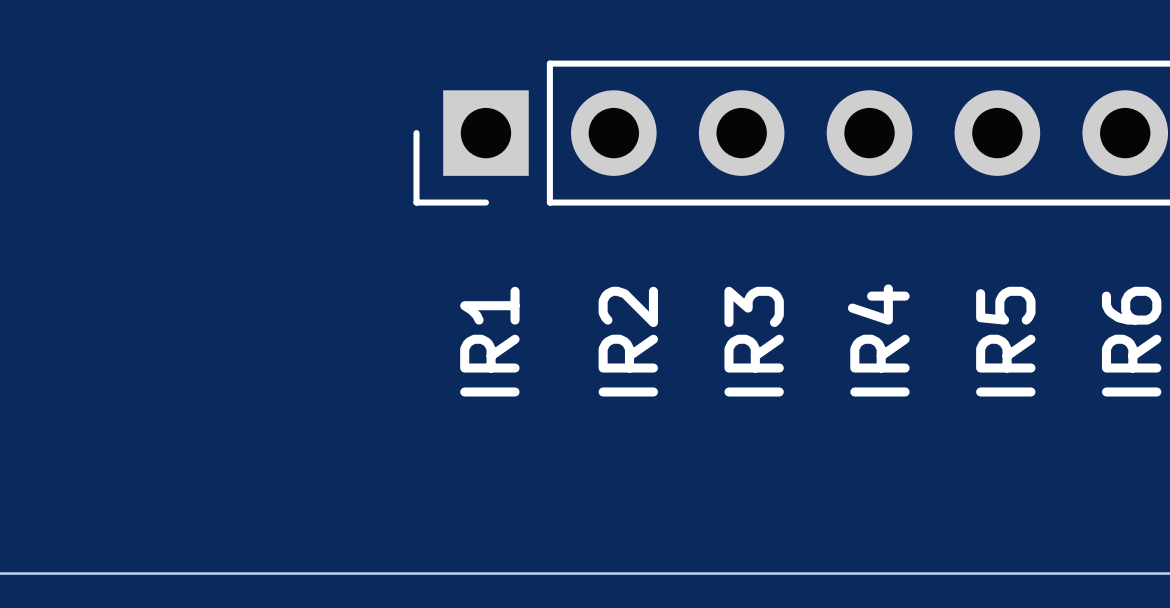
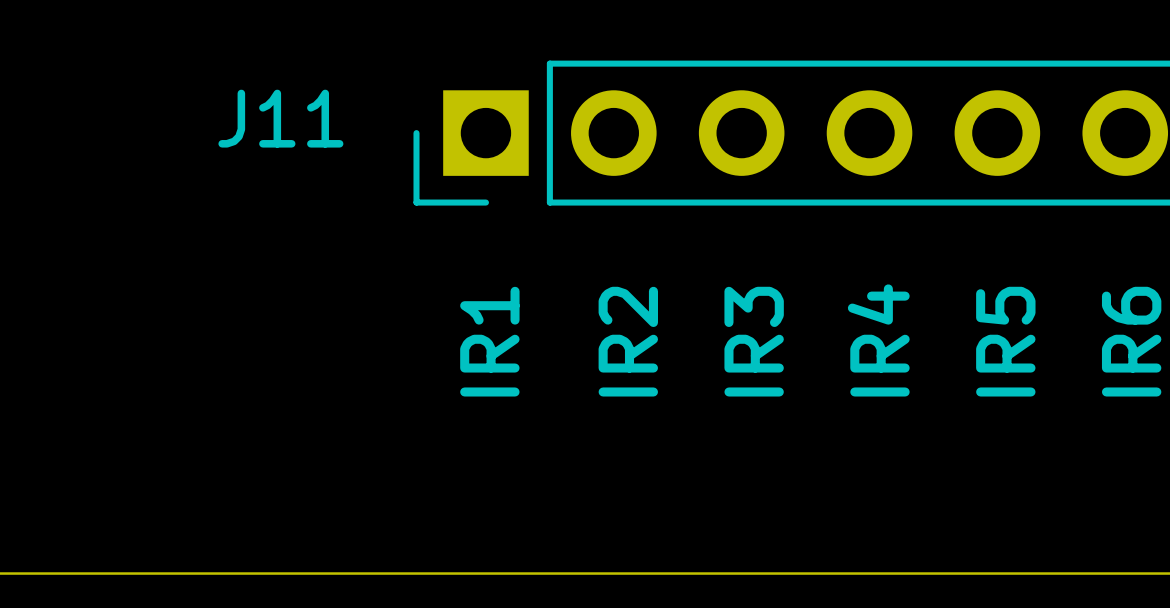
J11 name: none -> J11 (280, 118)

